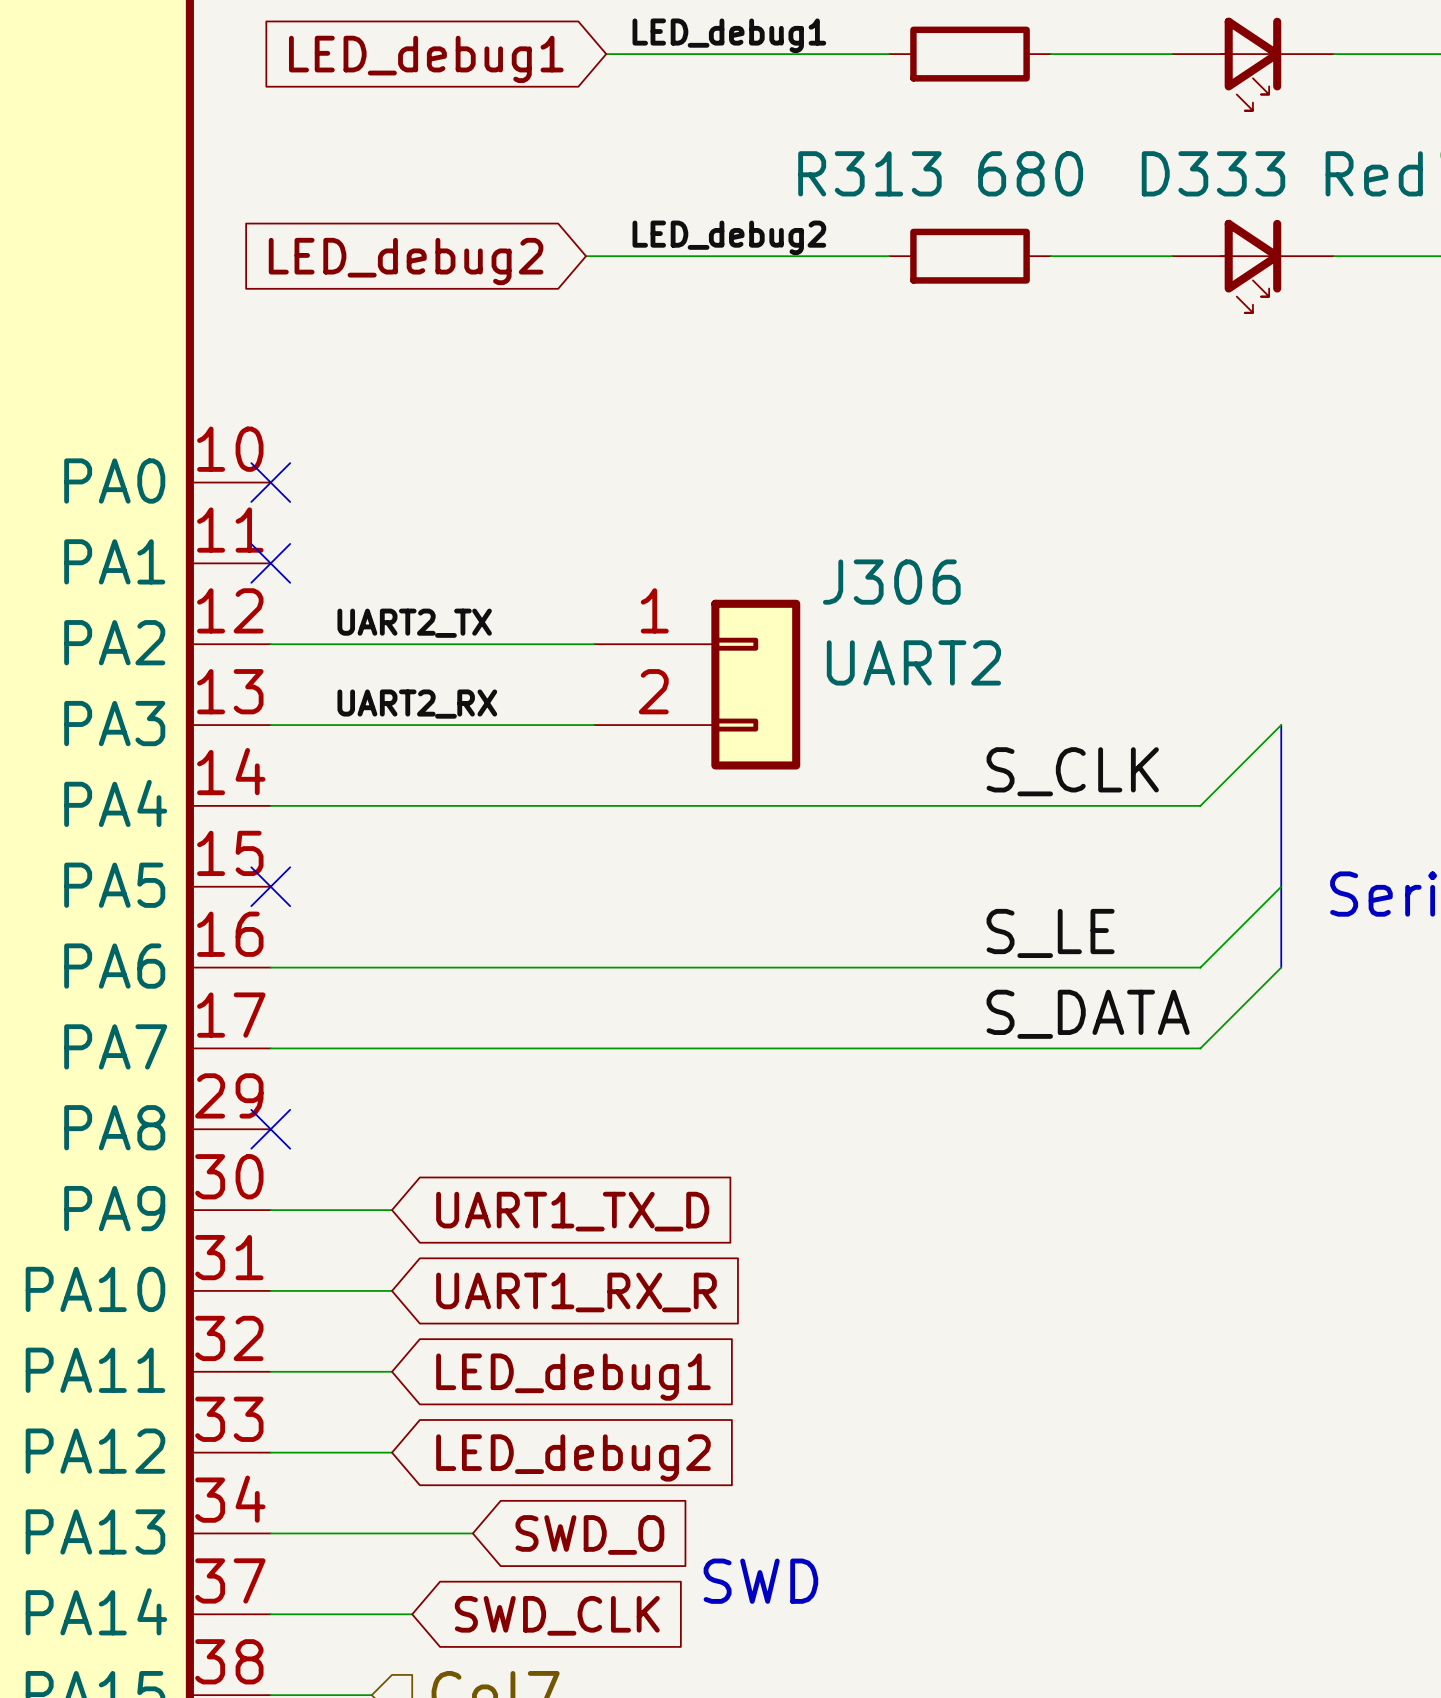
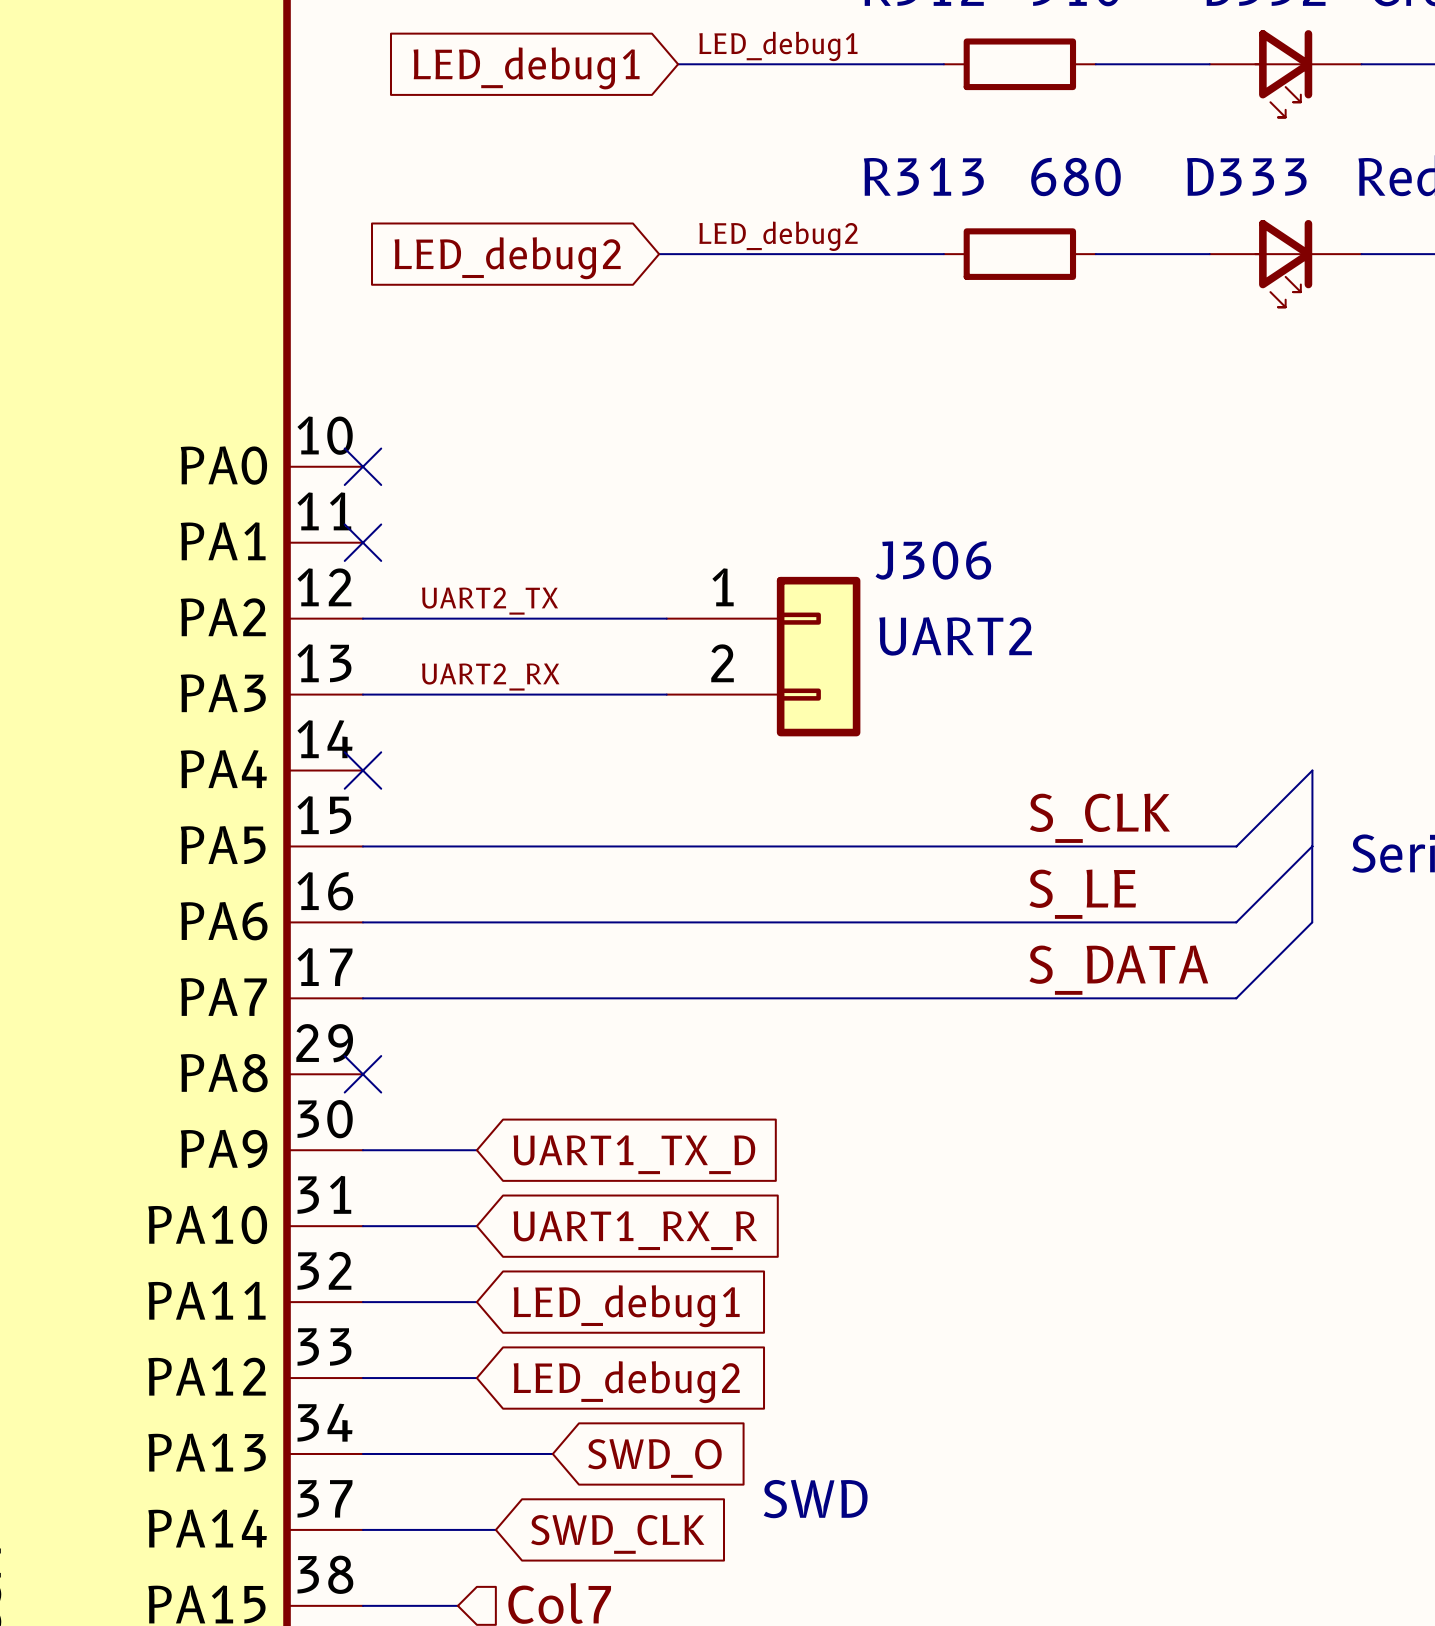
wire: (1281, 725) (1200, 805) (270, 805) -> (1312, 770) (1236, 846) (362, 846)
bus: (1281, 725) (1281, 886) -> (1312, 770) (1312, 846)
label position: S_CLK (1072, 771) -> S_CLK (1099, 818)
no-connect mark position: (270, 886) -> (362, 770)

